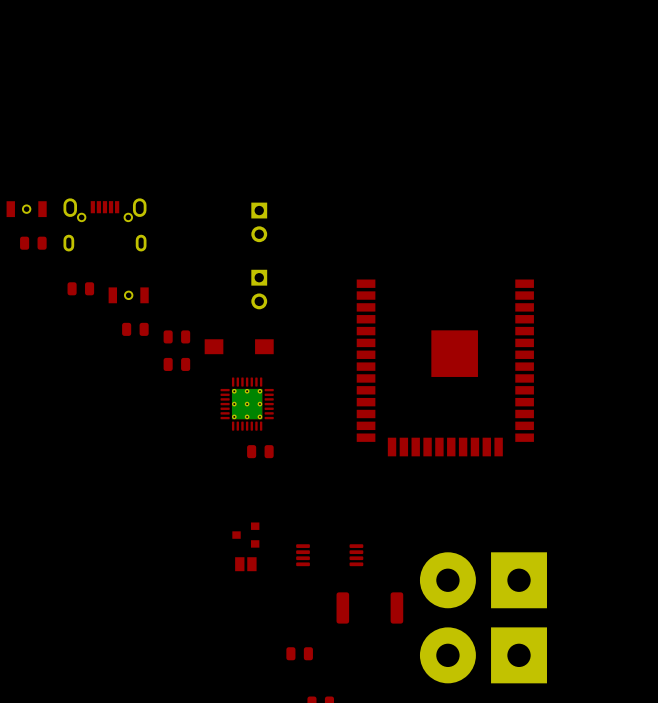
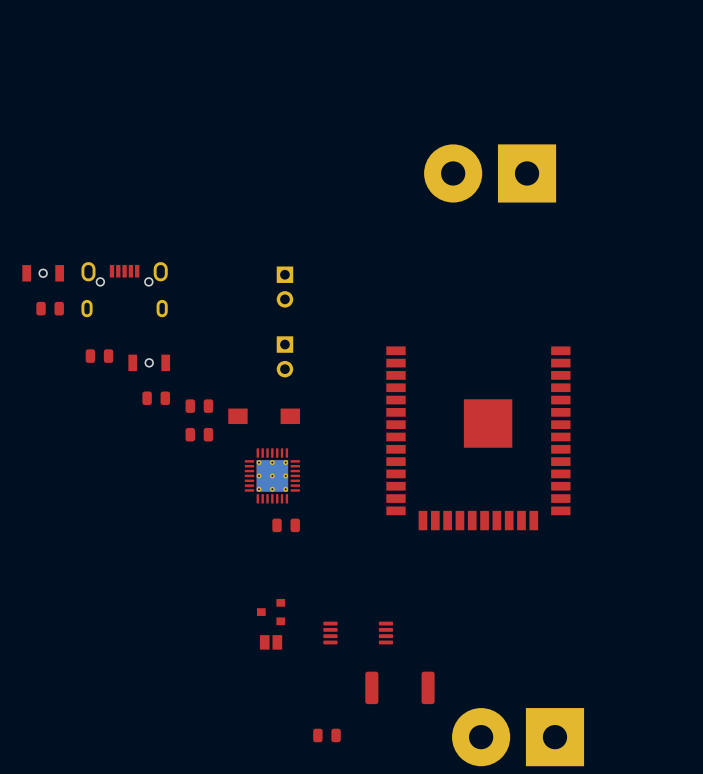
part: none -> (490, 173)
part: (483, 580) -> none

